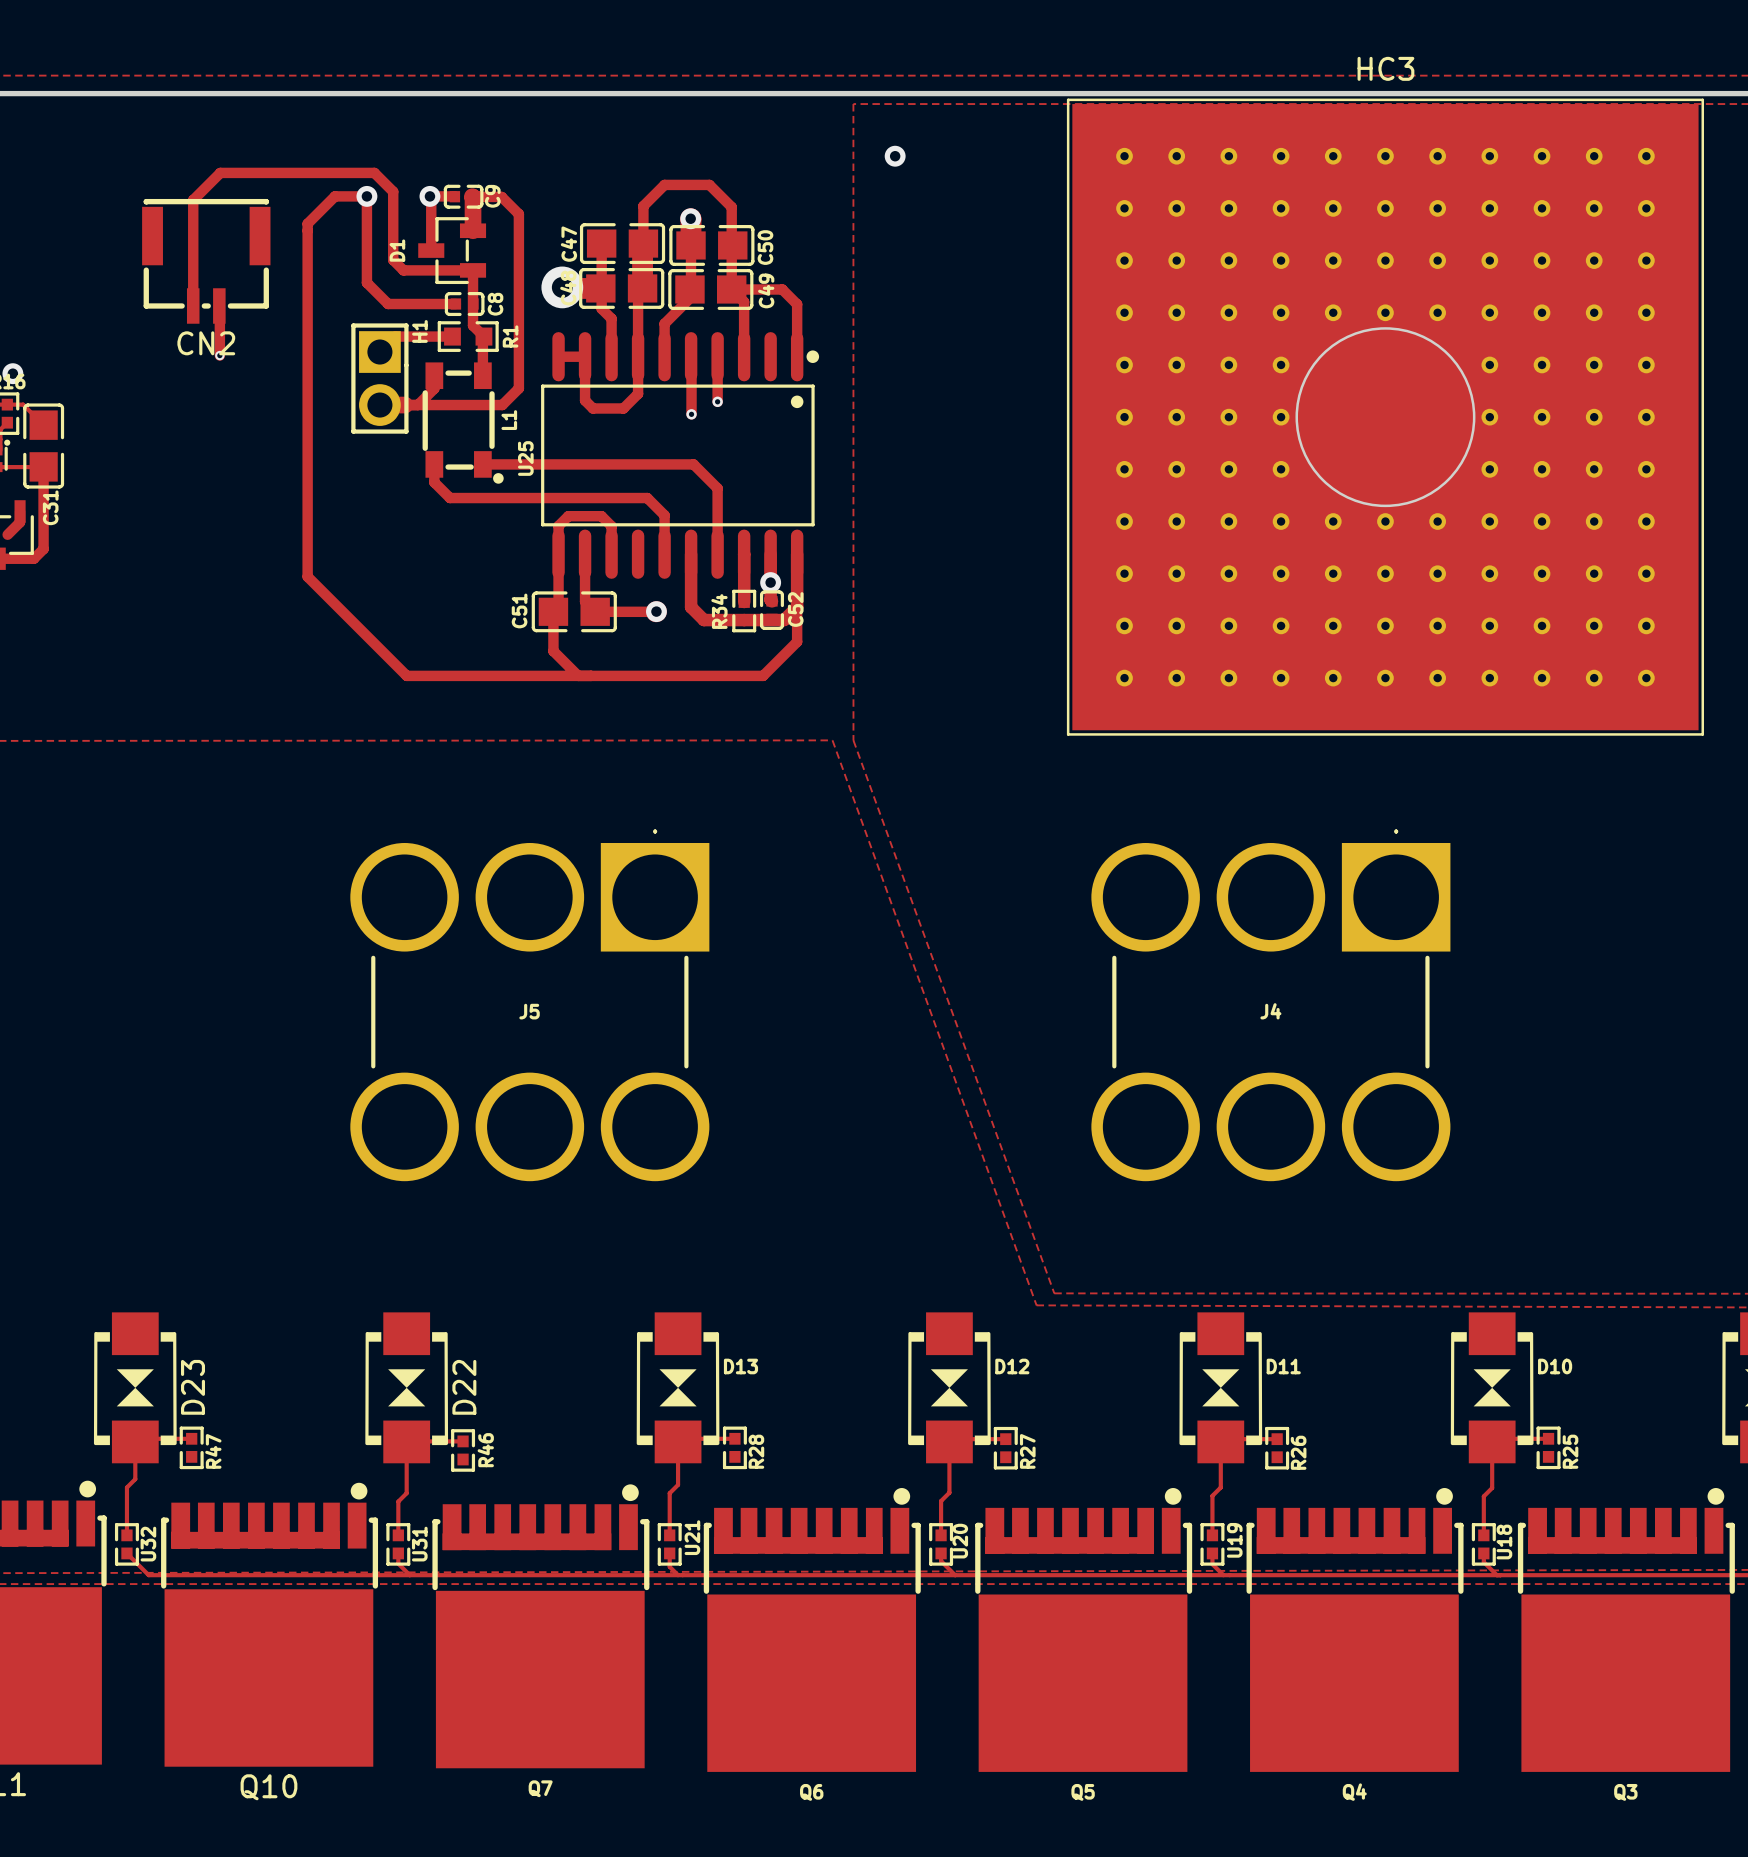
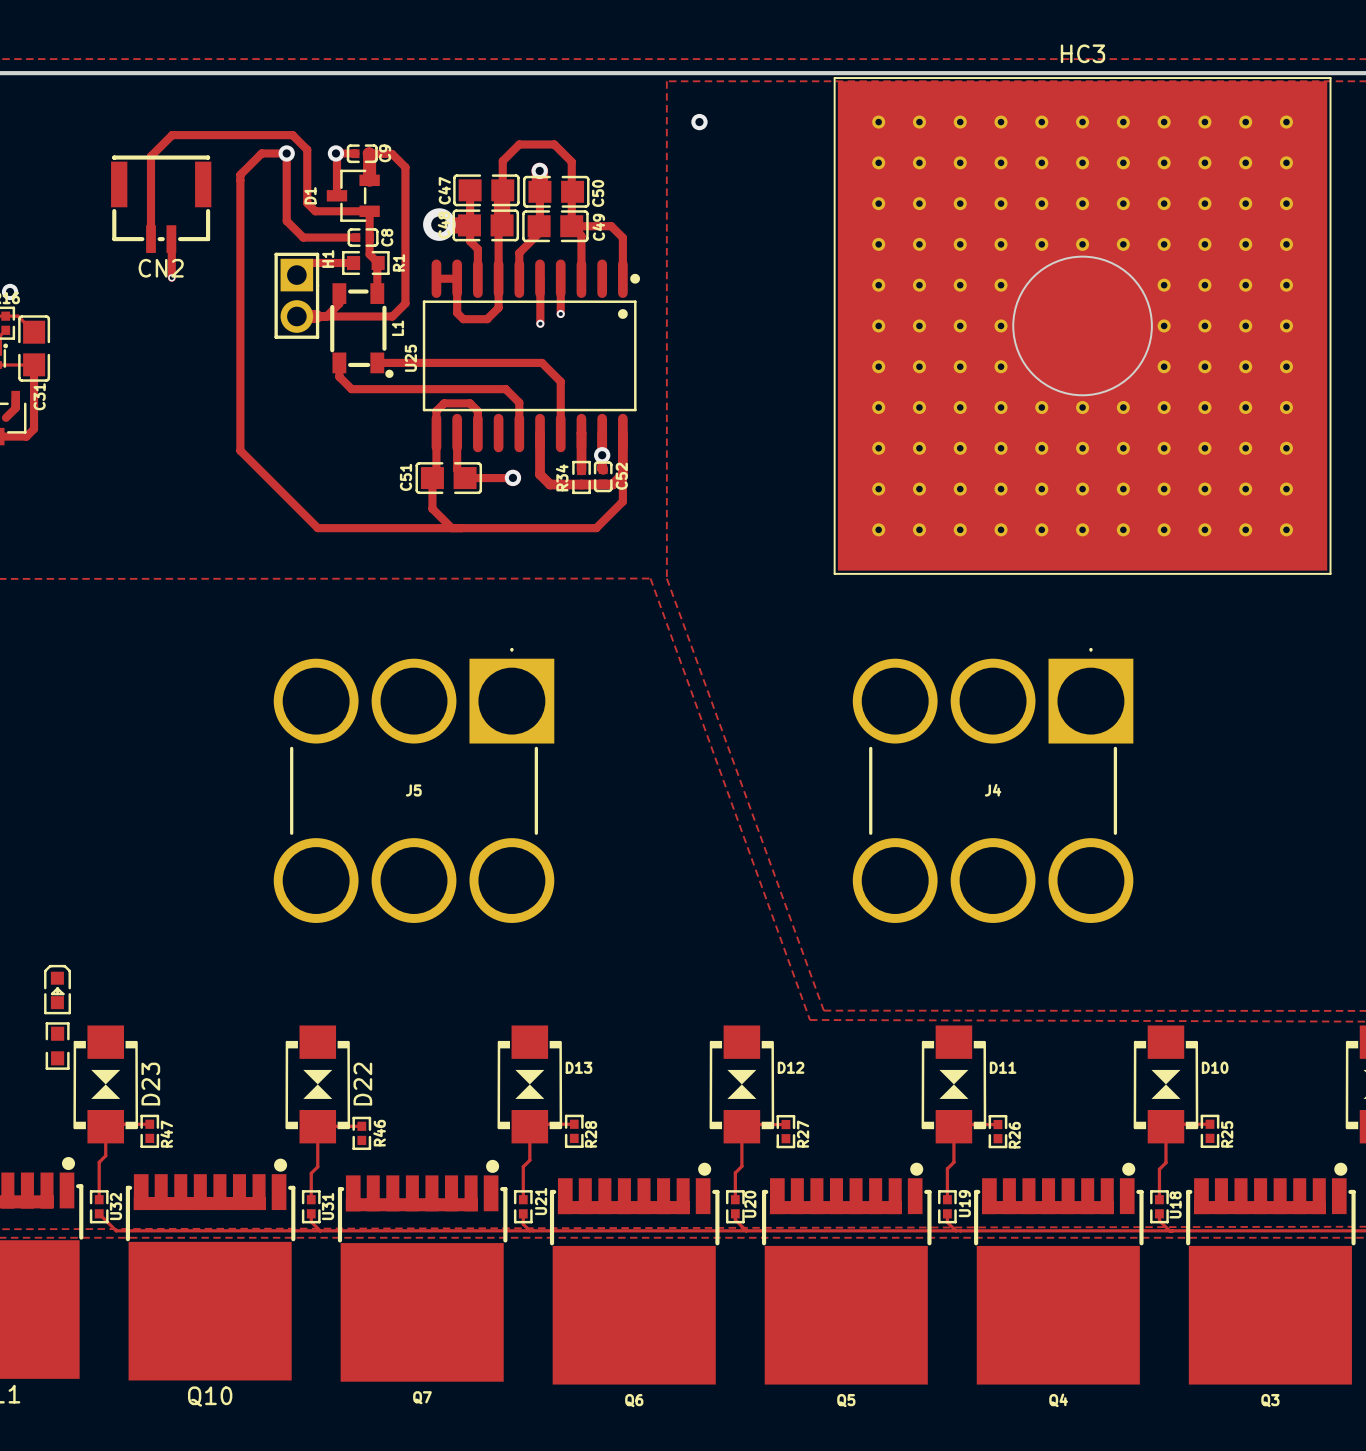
part: none -> (57, 989)
part: none -> (57, 1046)

